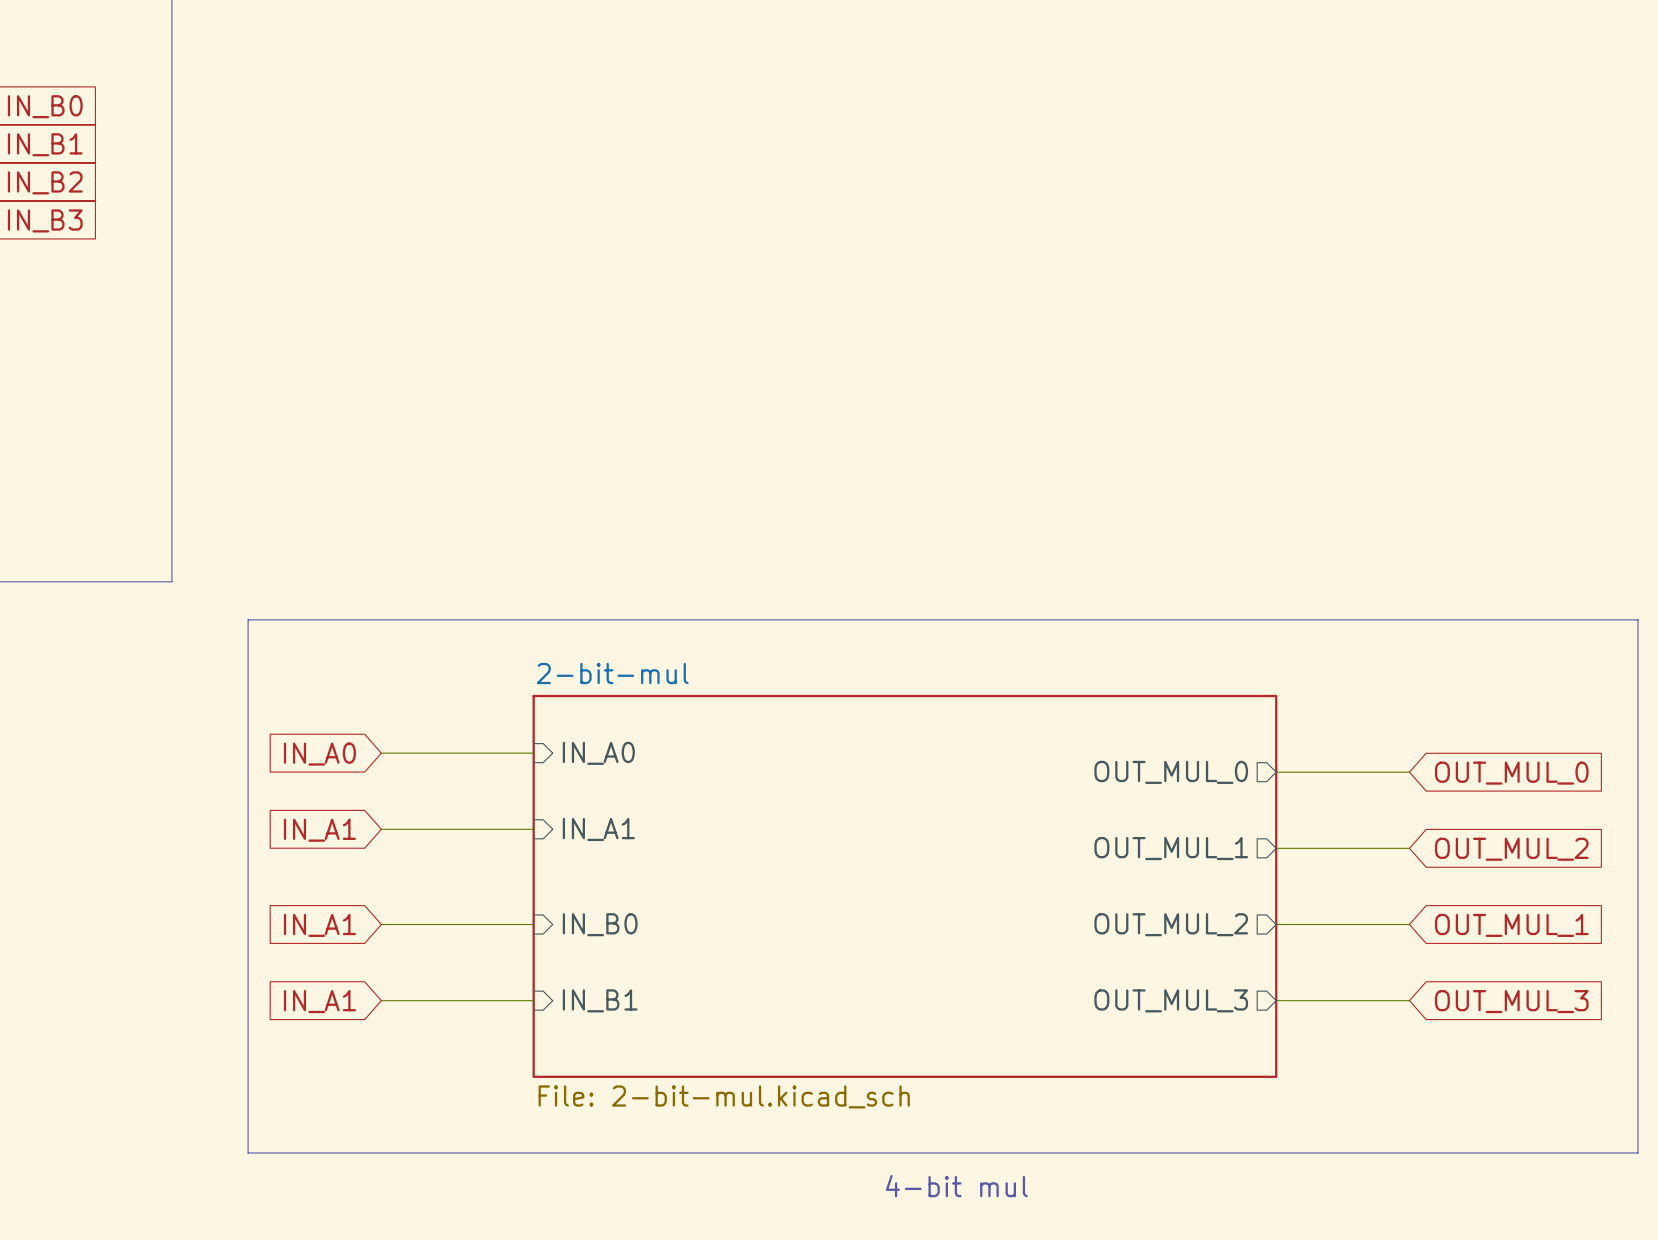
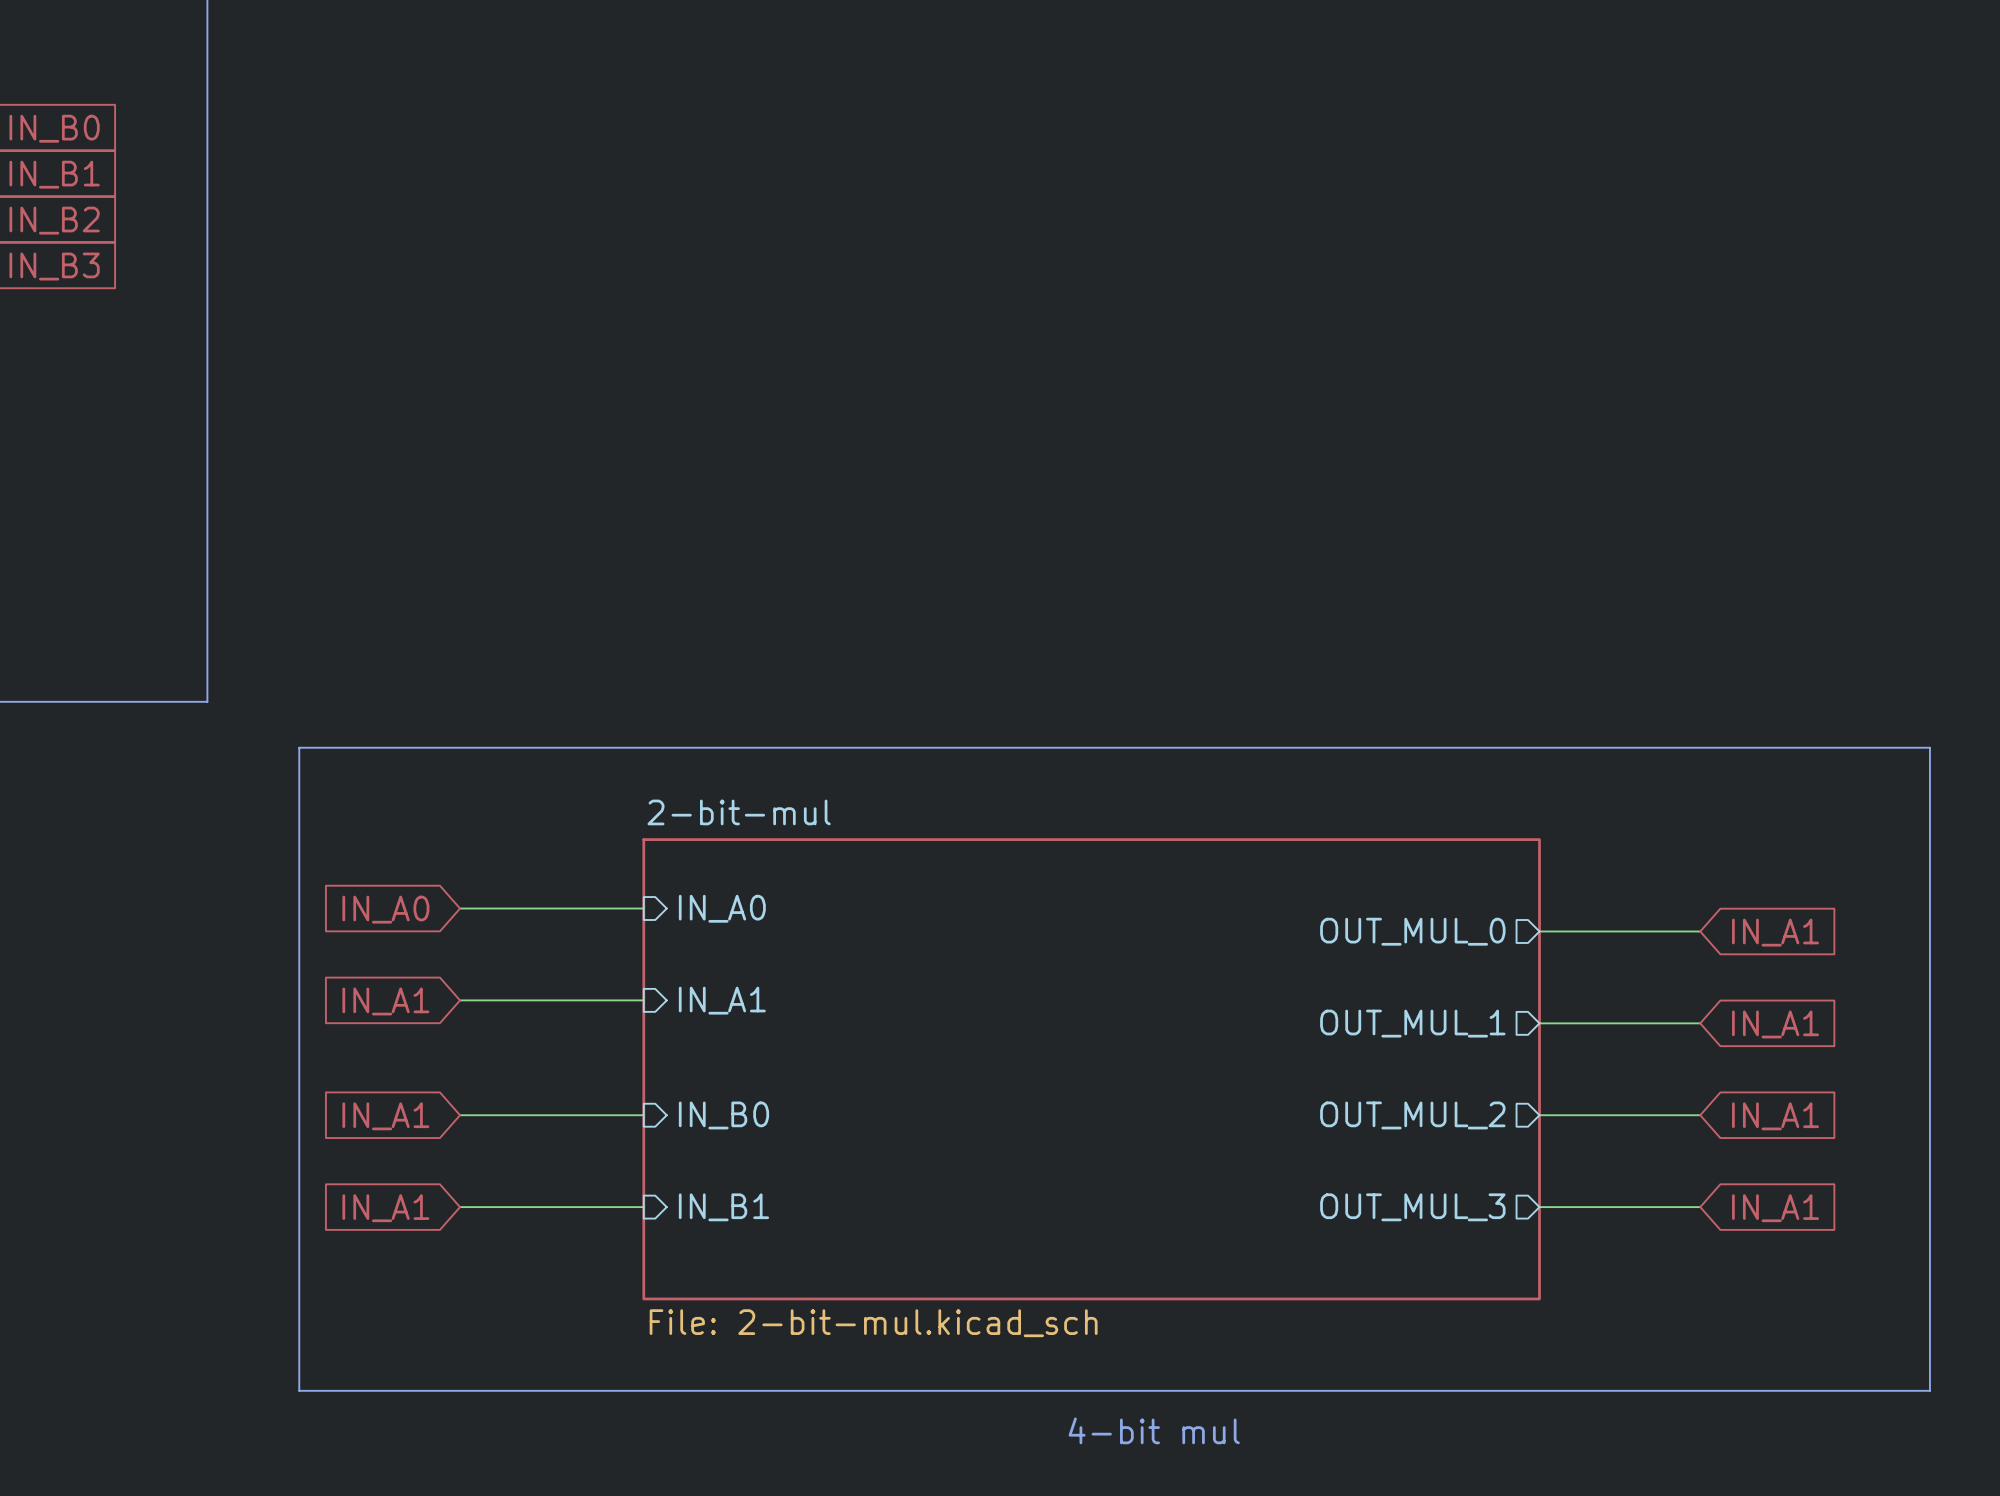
line: (1599, 619) (1637, 619) (1637, 1152) (1599, 1152) -> (1929, 747) (1929, 1390)
global label: OUT_MUL_0 (1511, 773) -> IN_A1 (1775, 932)
global label: OUT_MUL_2 (1511, 849) -> IN_A1 (1775, 1024)
global label: OUT_MUL_1 (1511, 925) -> IN_A1 (1775, 1116)
global label: OUT_MUL_3 (1511, 1001) -> IN_A1 (1775, 1208)

